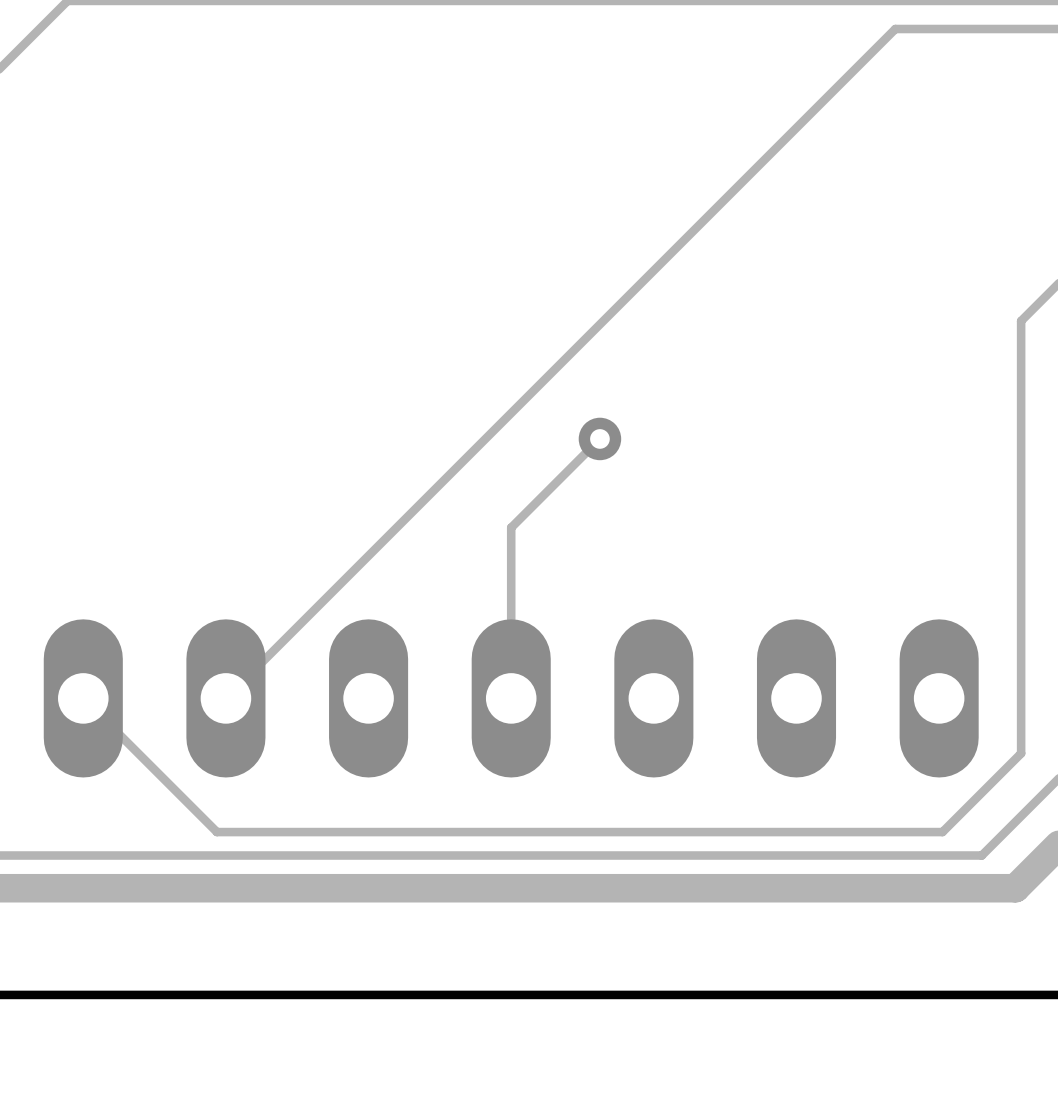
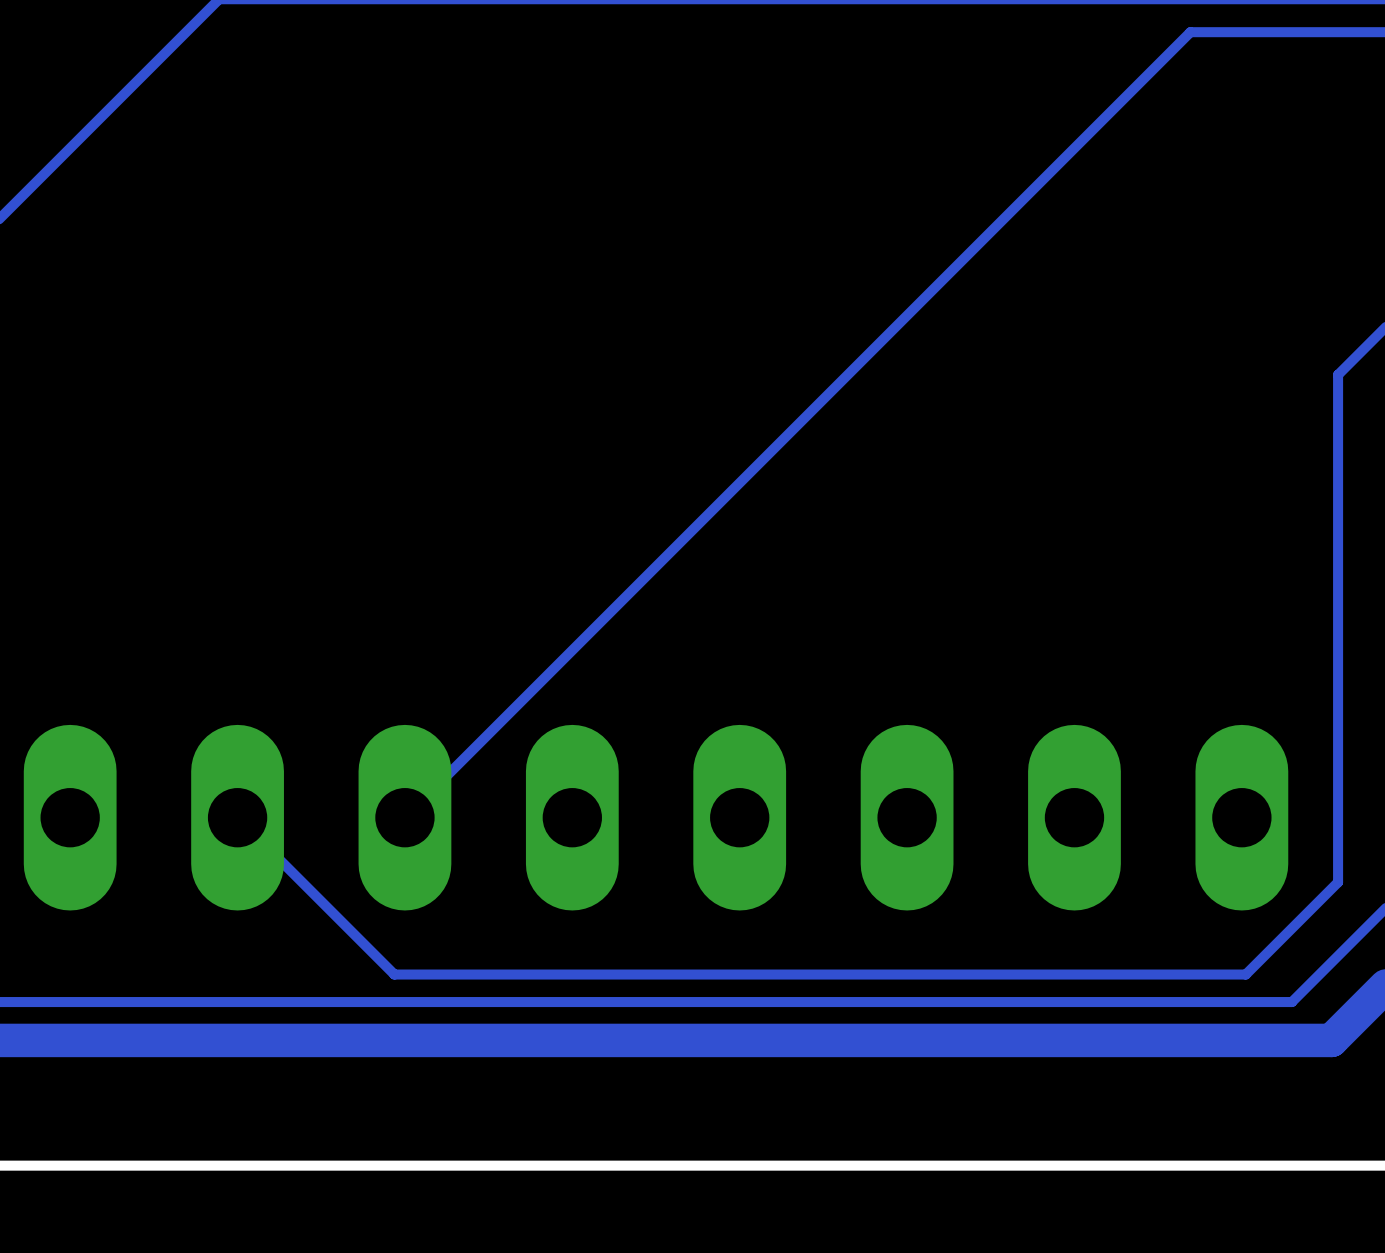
track: (599, 438) (511, 527) (511, 698) -> none
via: (599, 438) -> none

